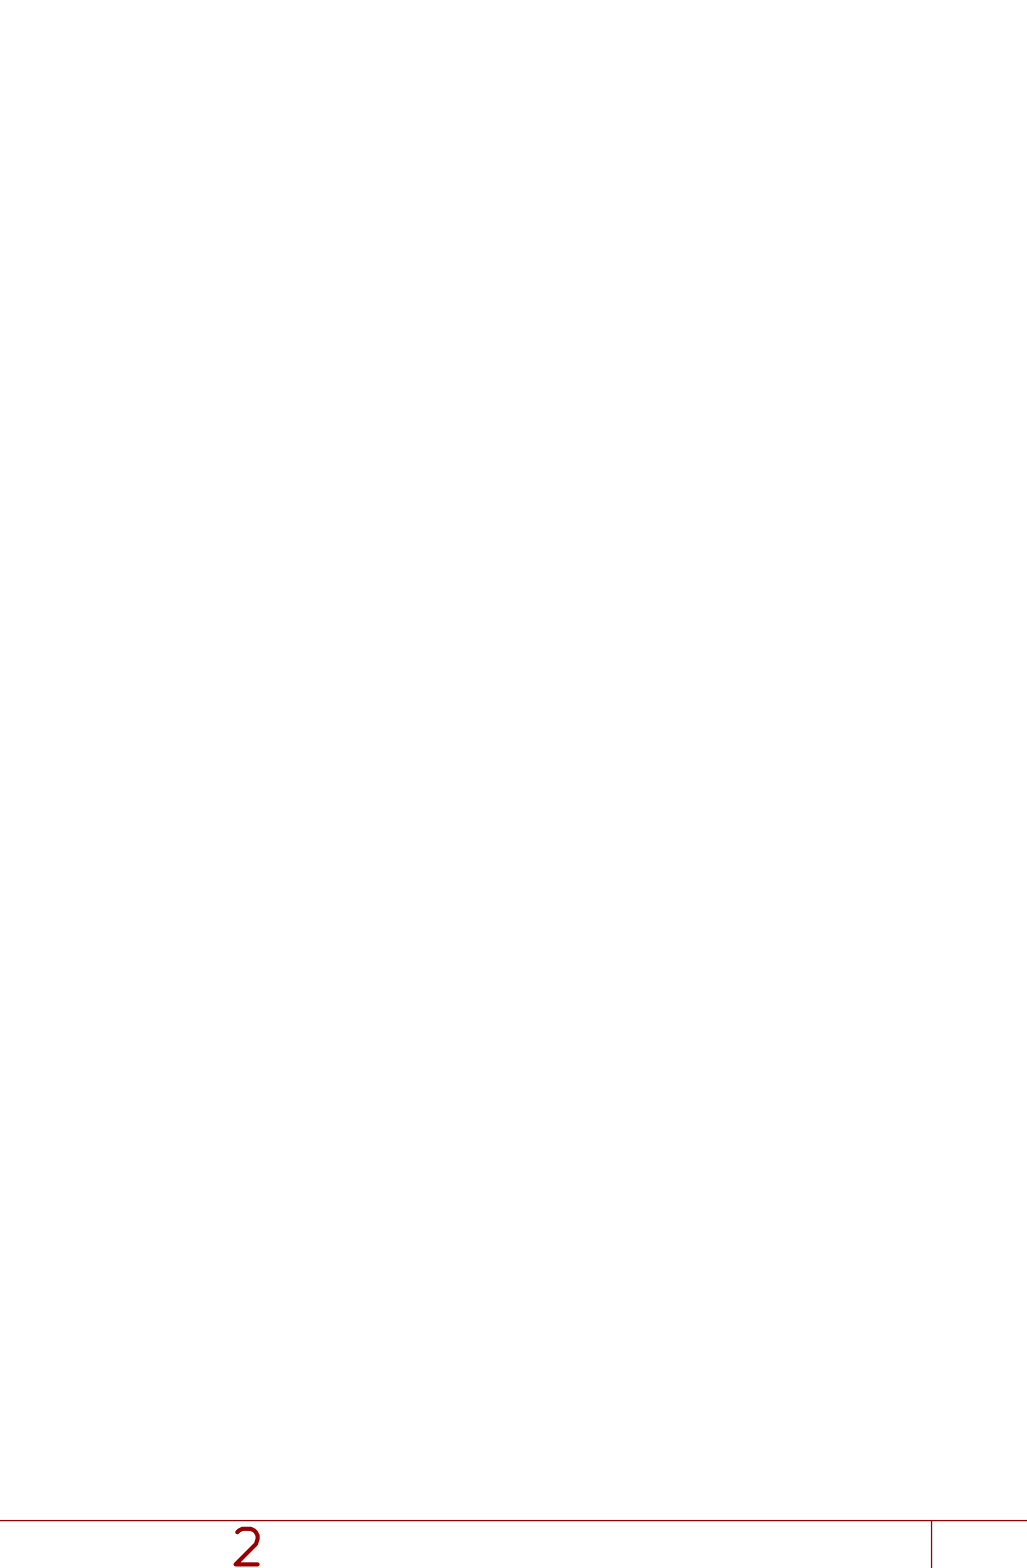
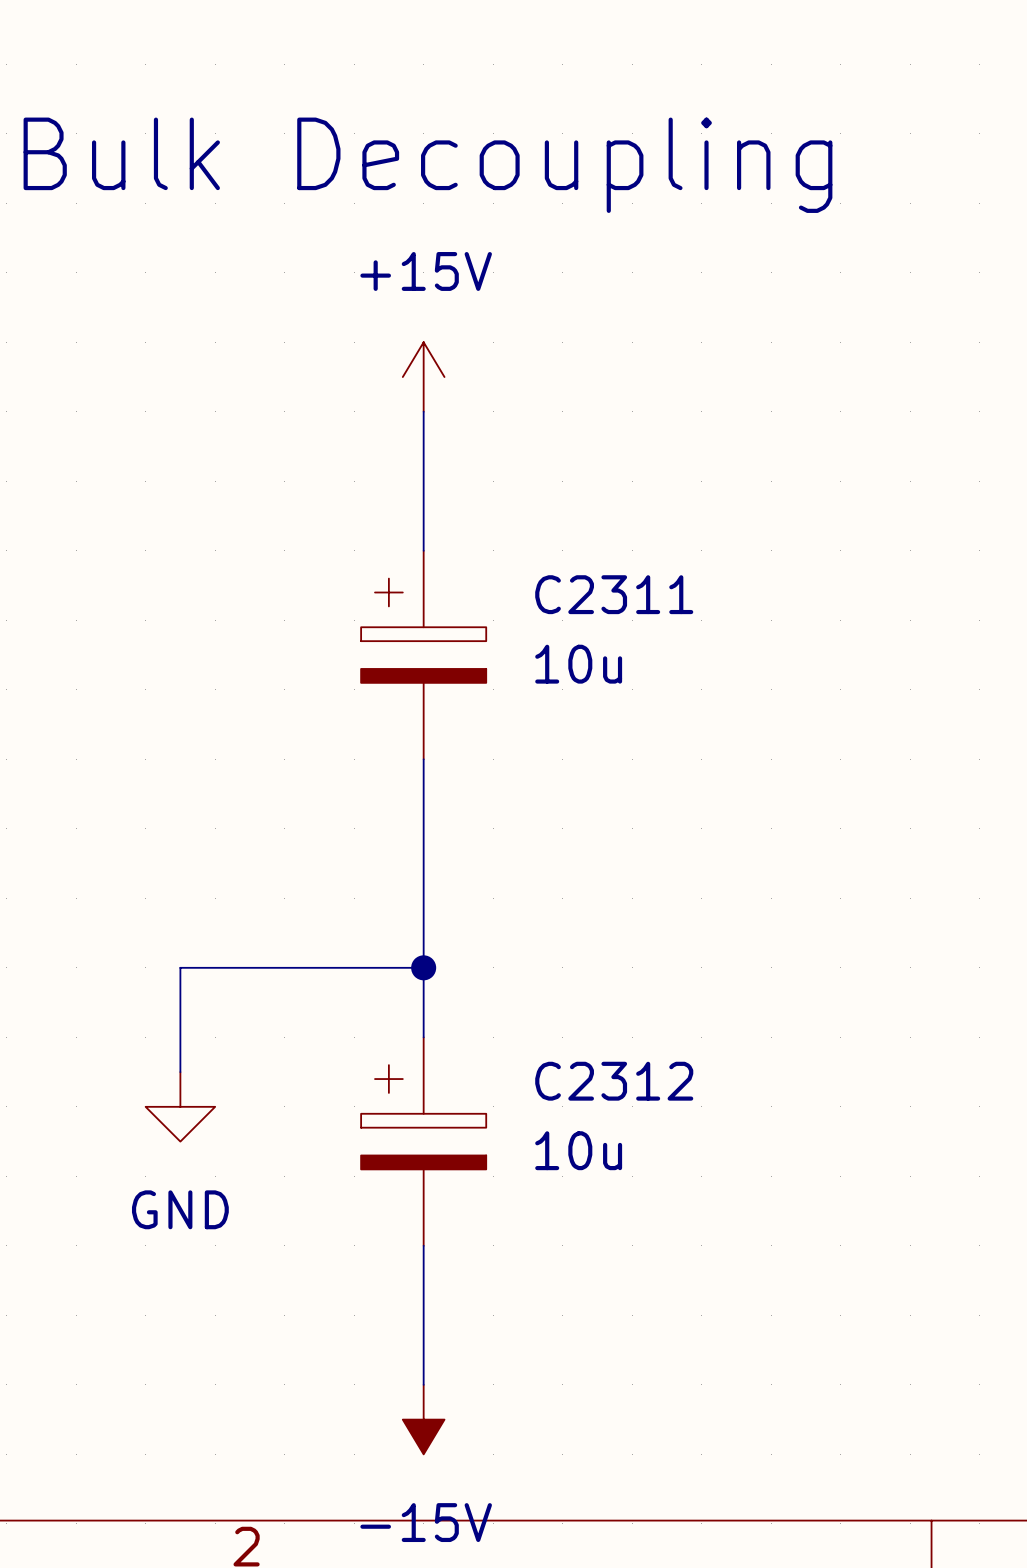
text: none -> Bulk Decoupling (427, 165)
power symbol: none -> +15V (423, 377)
wire: none -> (423, 411) (423, 550)
C2311: none -> 10u (423, 655)
wire: none -> (423, 759) (423, 1037)
wire: none -> (423, 967) (180, 967) (180, 1072)
junction: none -> (423, 967)
power symbol: none -> GND (180, 1106)
C2312: none -> 10u (423, 1141)
wire: none -> (423, 1245) (423, 1384)
power symbol: none -> -15V (423, 1419)

